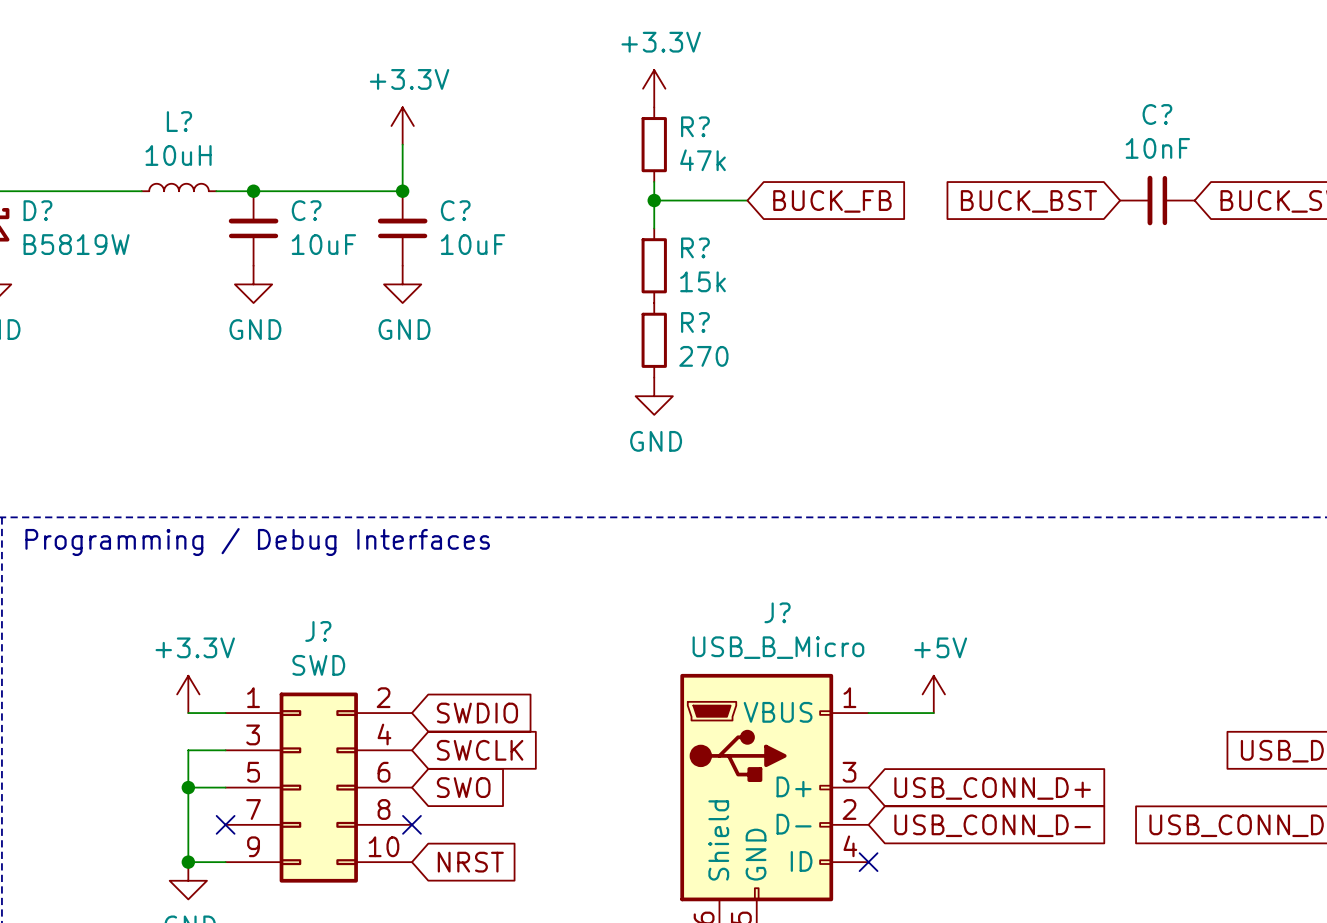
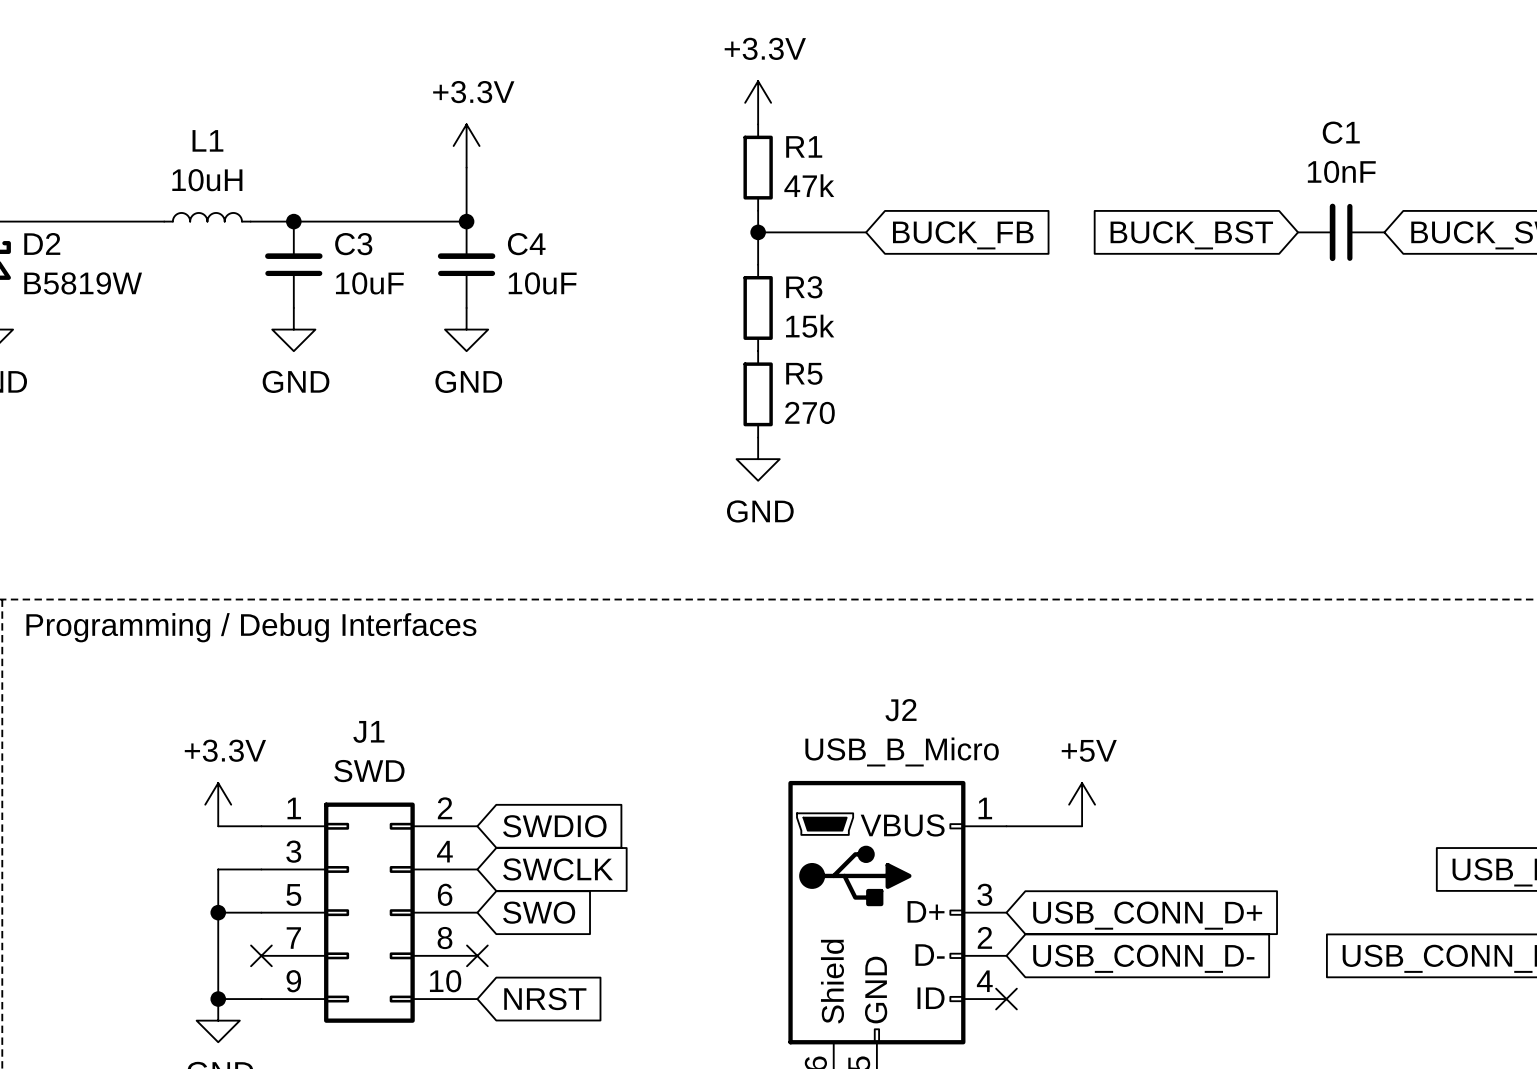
C? name: C? (1157, 114) -> C1 (1341, 132)
L? name: L? (179, 121) -> L1 (207, 140)
R? name: R? (695, 126) -> R1 (804, 146)
D? name: D? (37, 210) -> D2 (42, 243)
C? name: C? (306, 210) -> C3 (353, 244)
C? name: C? (455, 210) -> C4 (526, 244)
R? name: R? (695, 247) -> R3 (804, 287)
R? name: R? (695, 322) -> R5 (804, 373)
J? name: J? (777, 612) -> J2 (900, 710)
J? name: J? (318, 631) -> J1 (368, 731)

